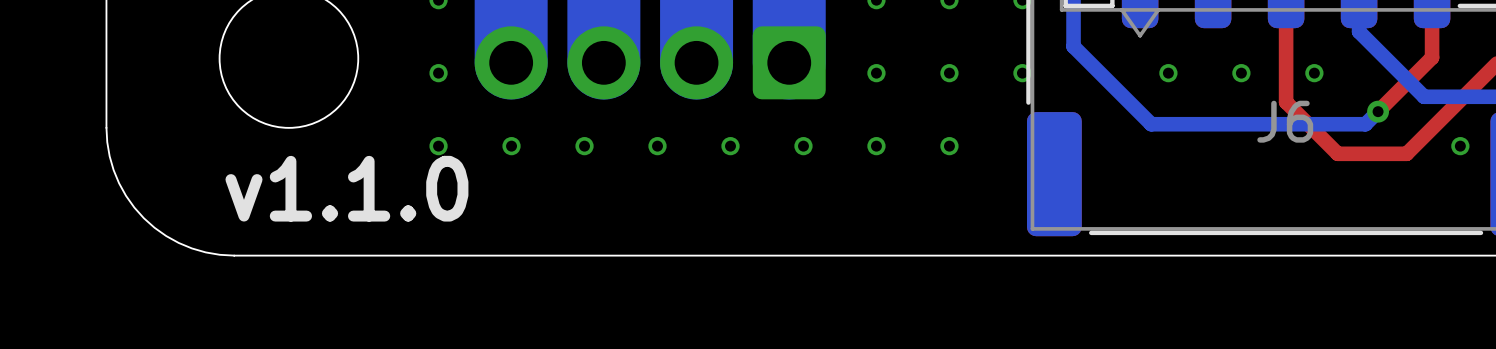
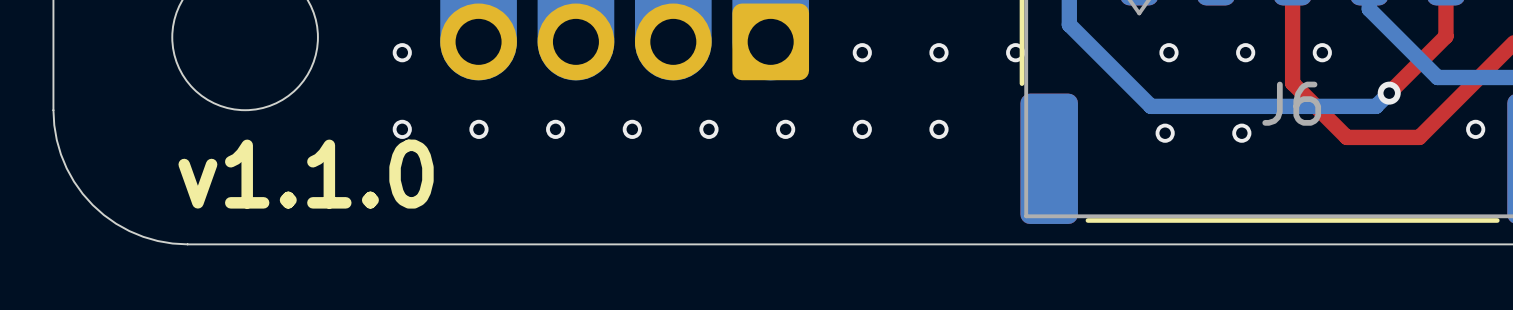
via: none -> (1165, 133)
via: none -> (1241, 133)

